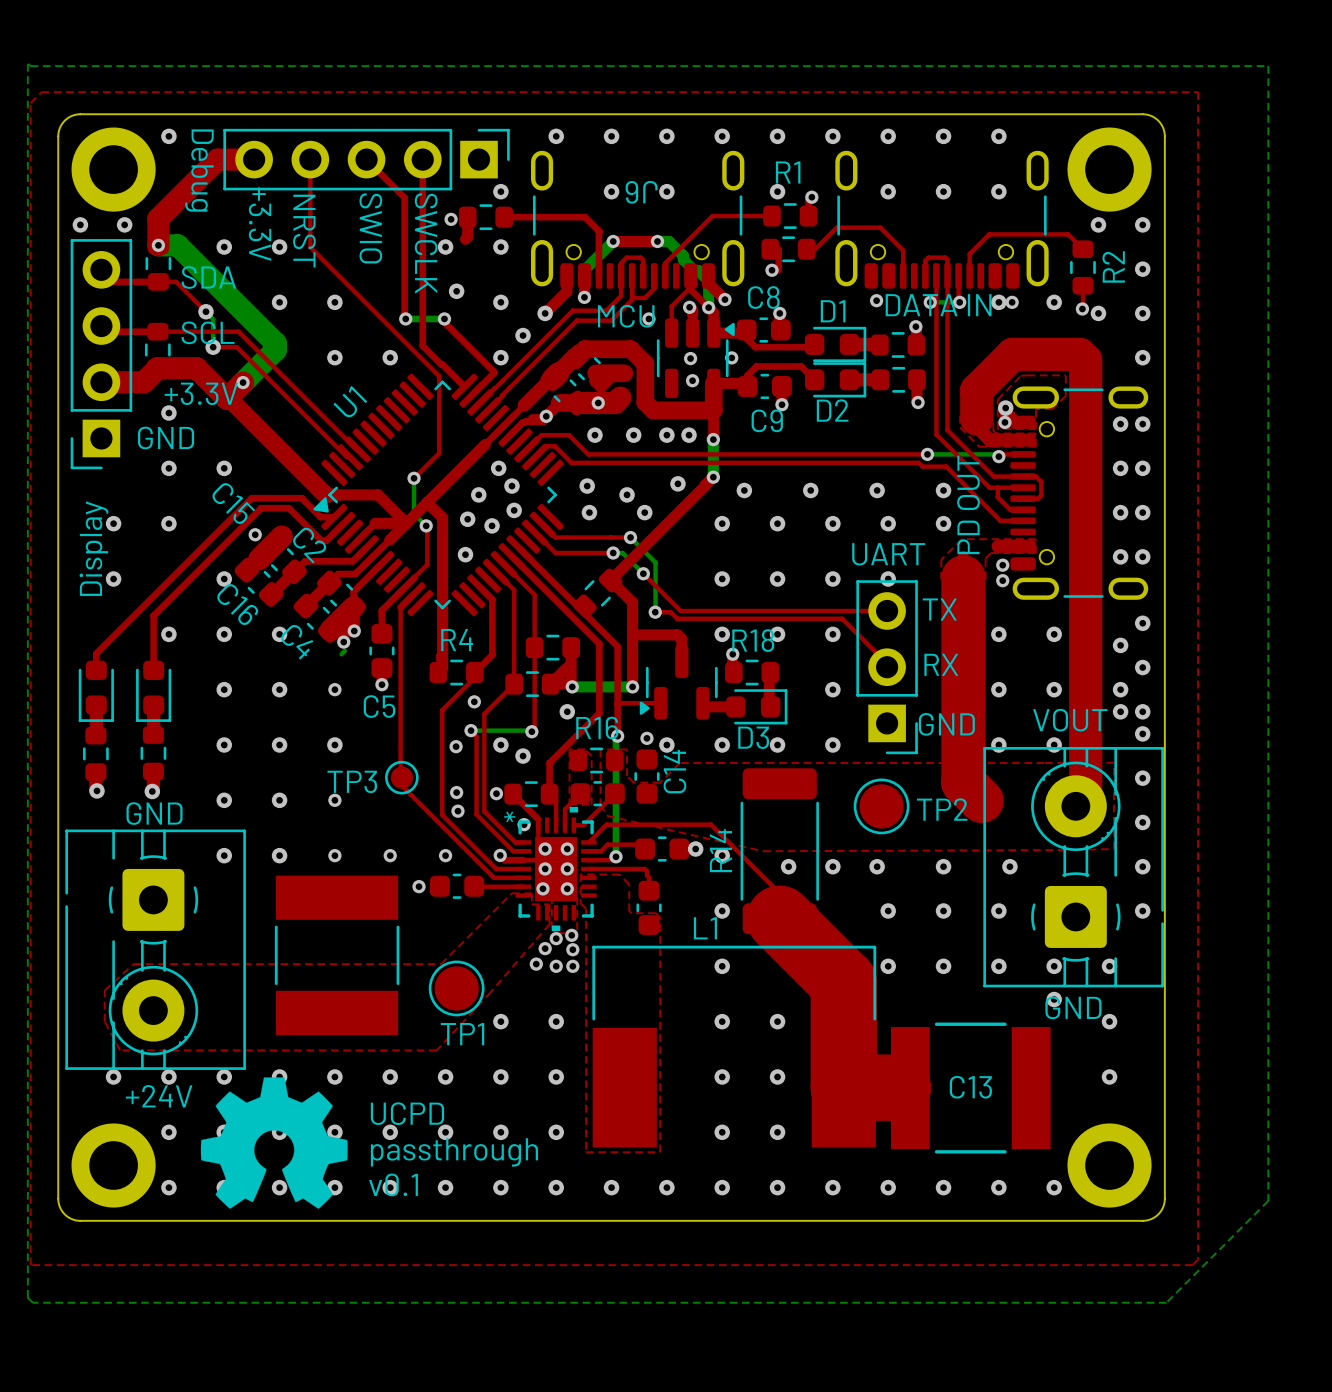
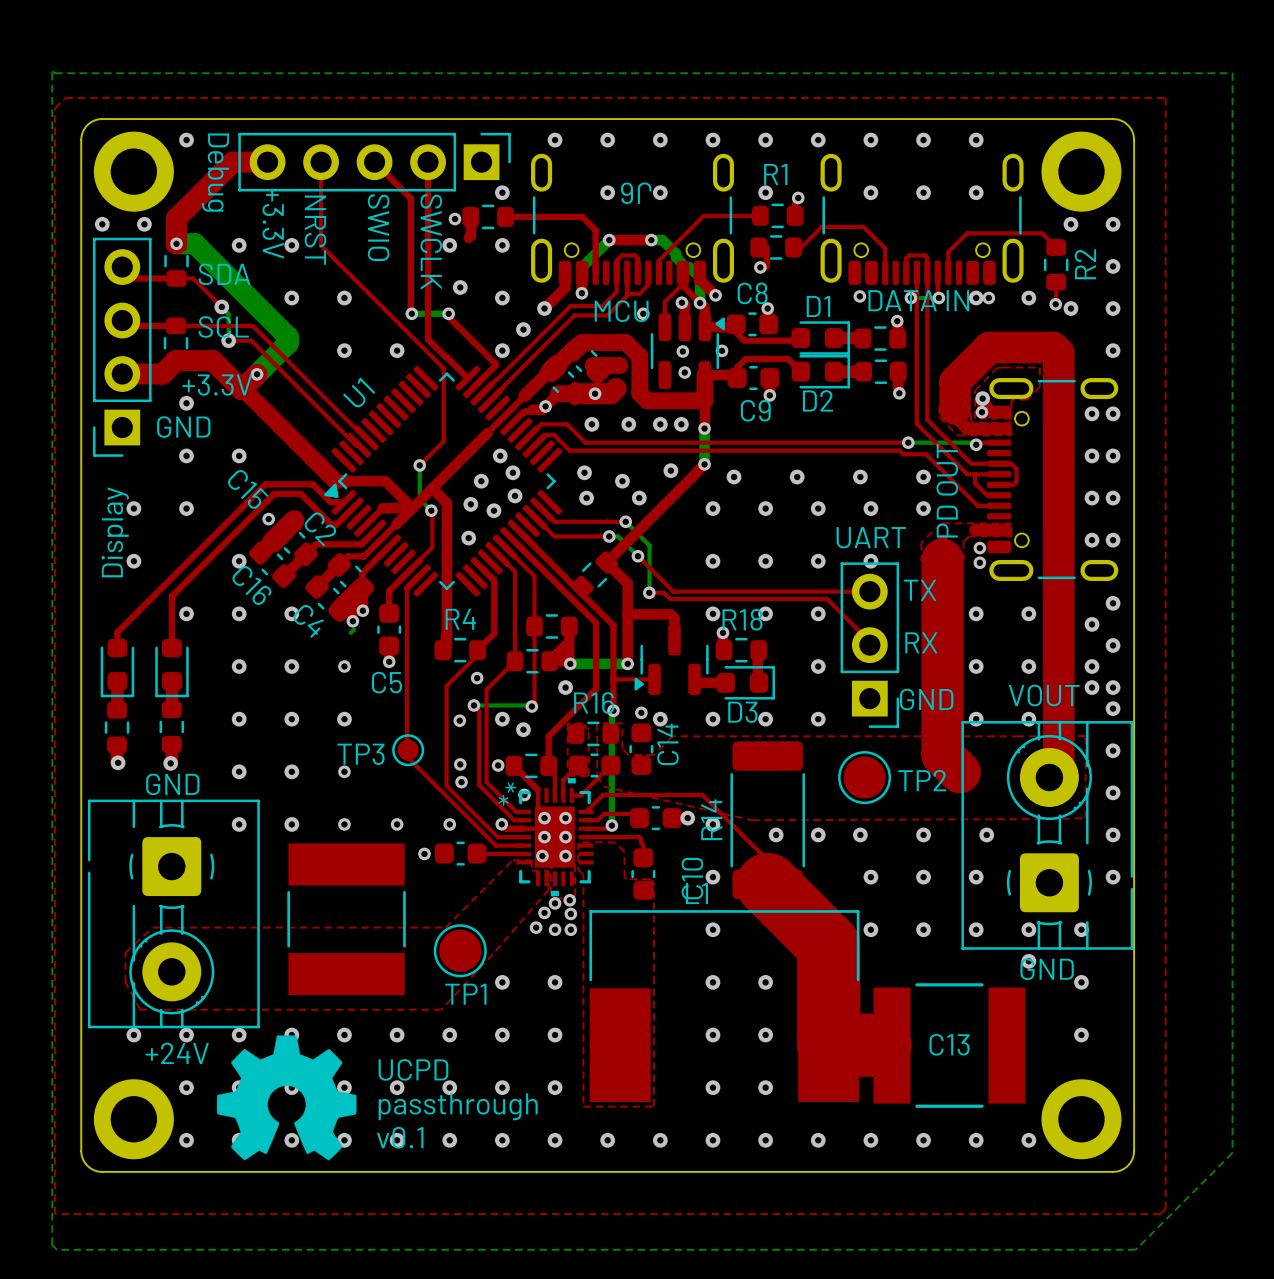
part text: none -> * (503, 800)
C10 name: none -> C10 (692, 878)

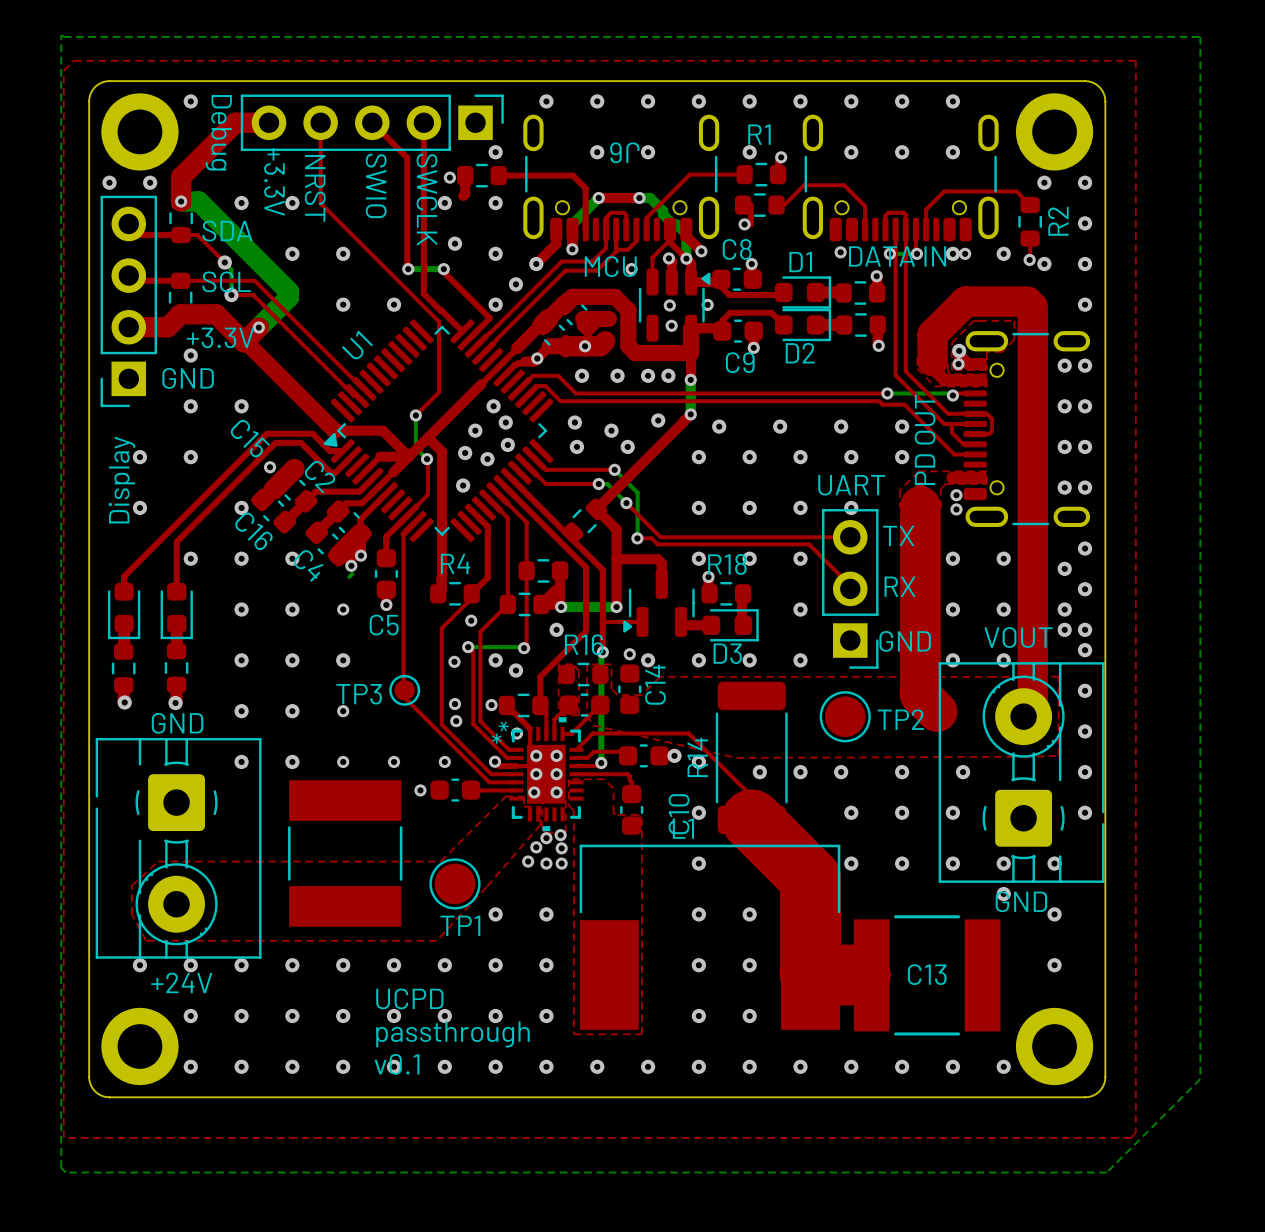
drawing: [216, 1035, 357, 1161] -> none

